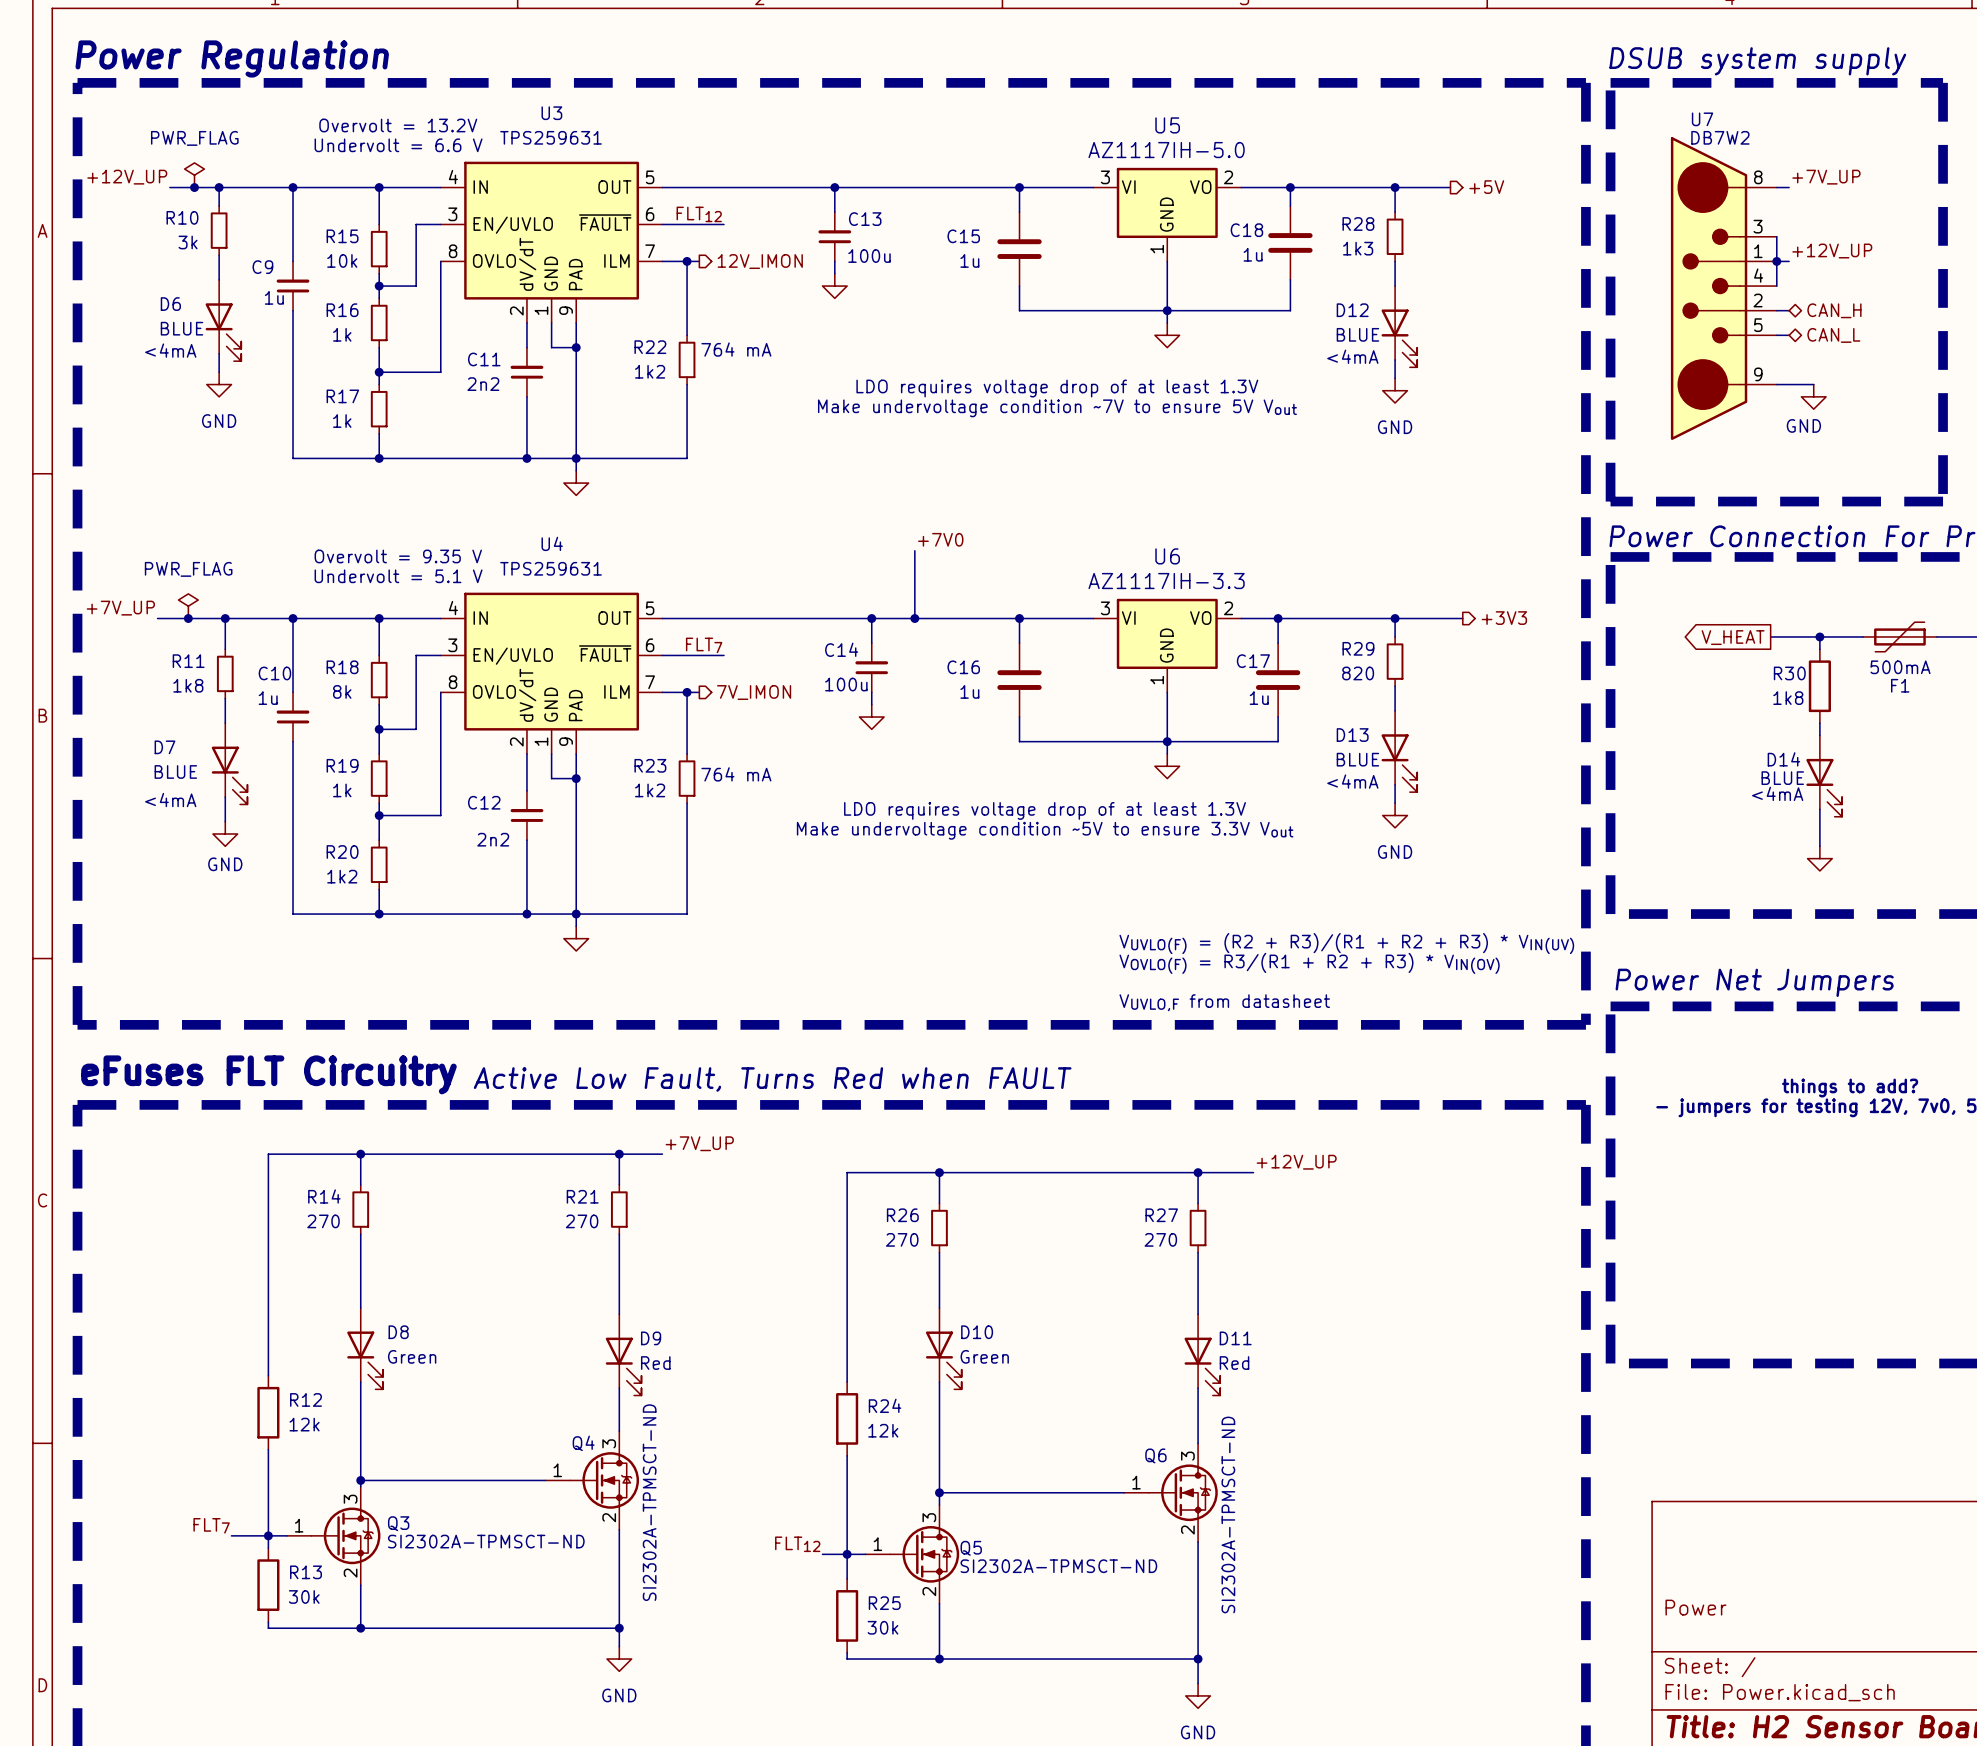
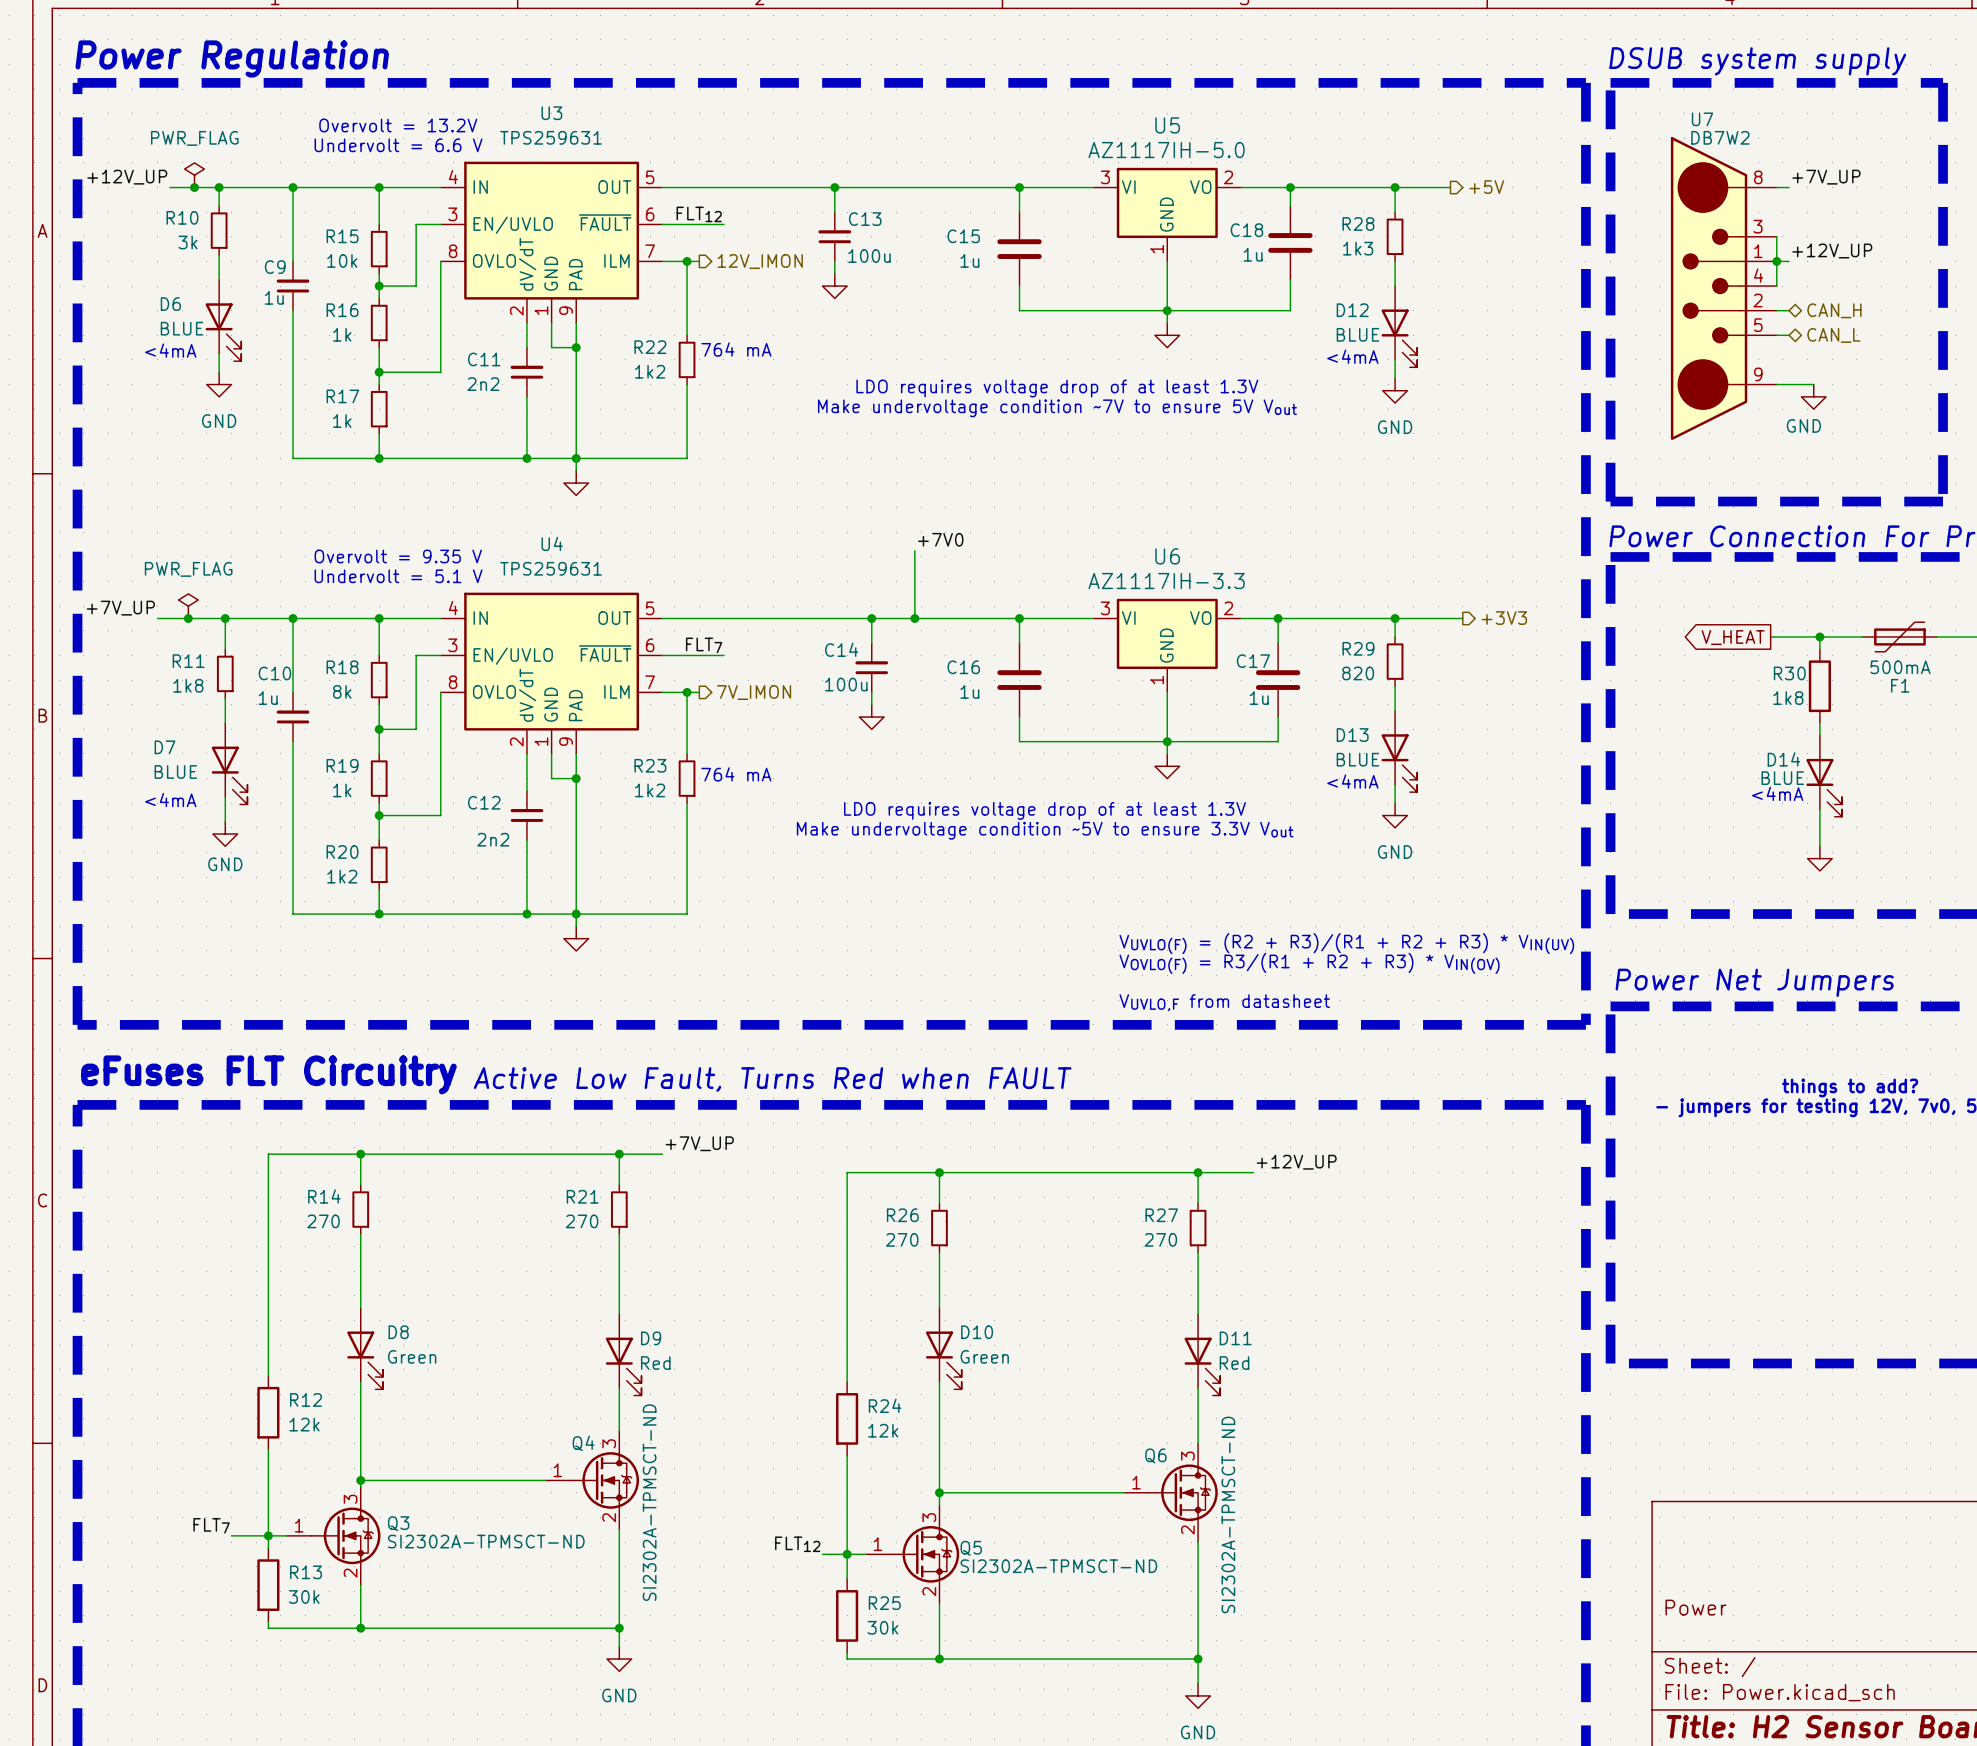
C9 name position: C9 (262, 267) -> C9 (275, 267)

